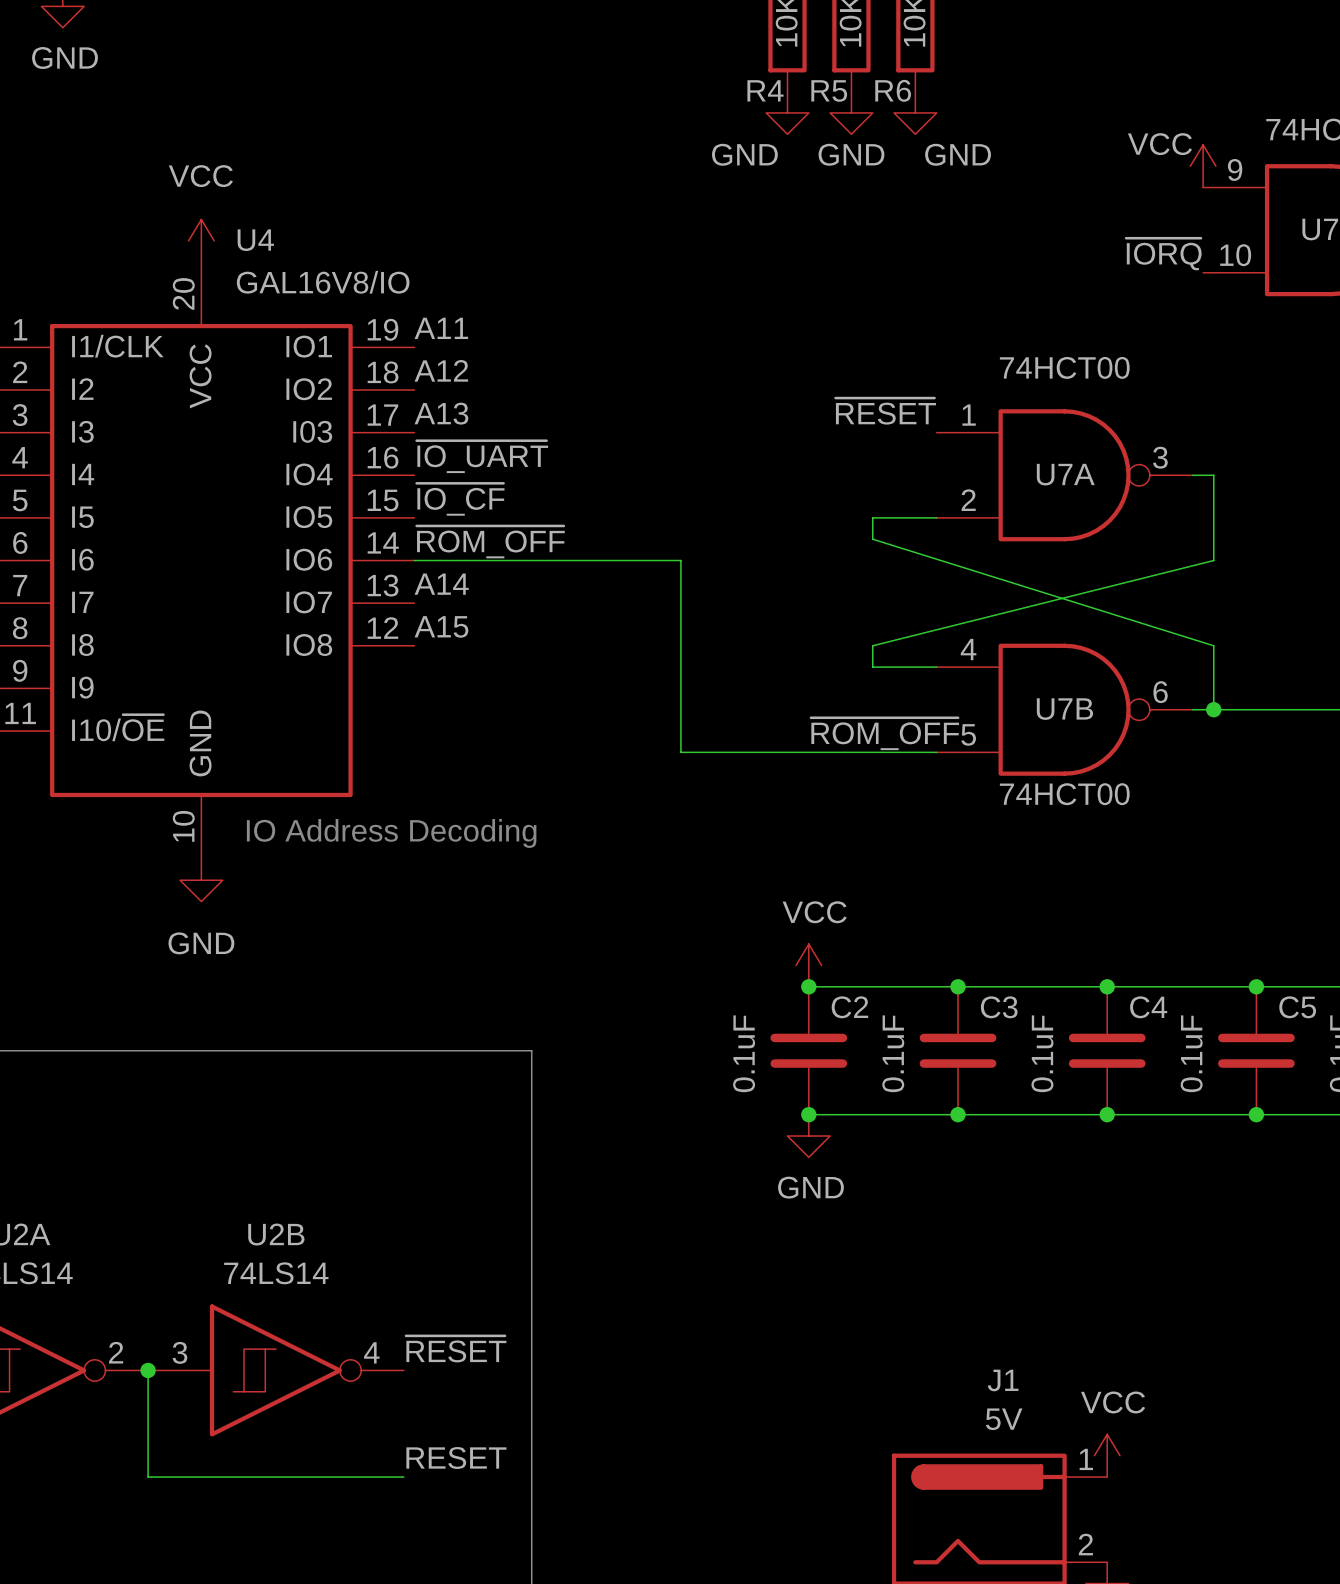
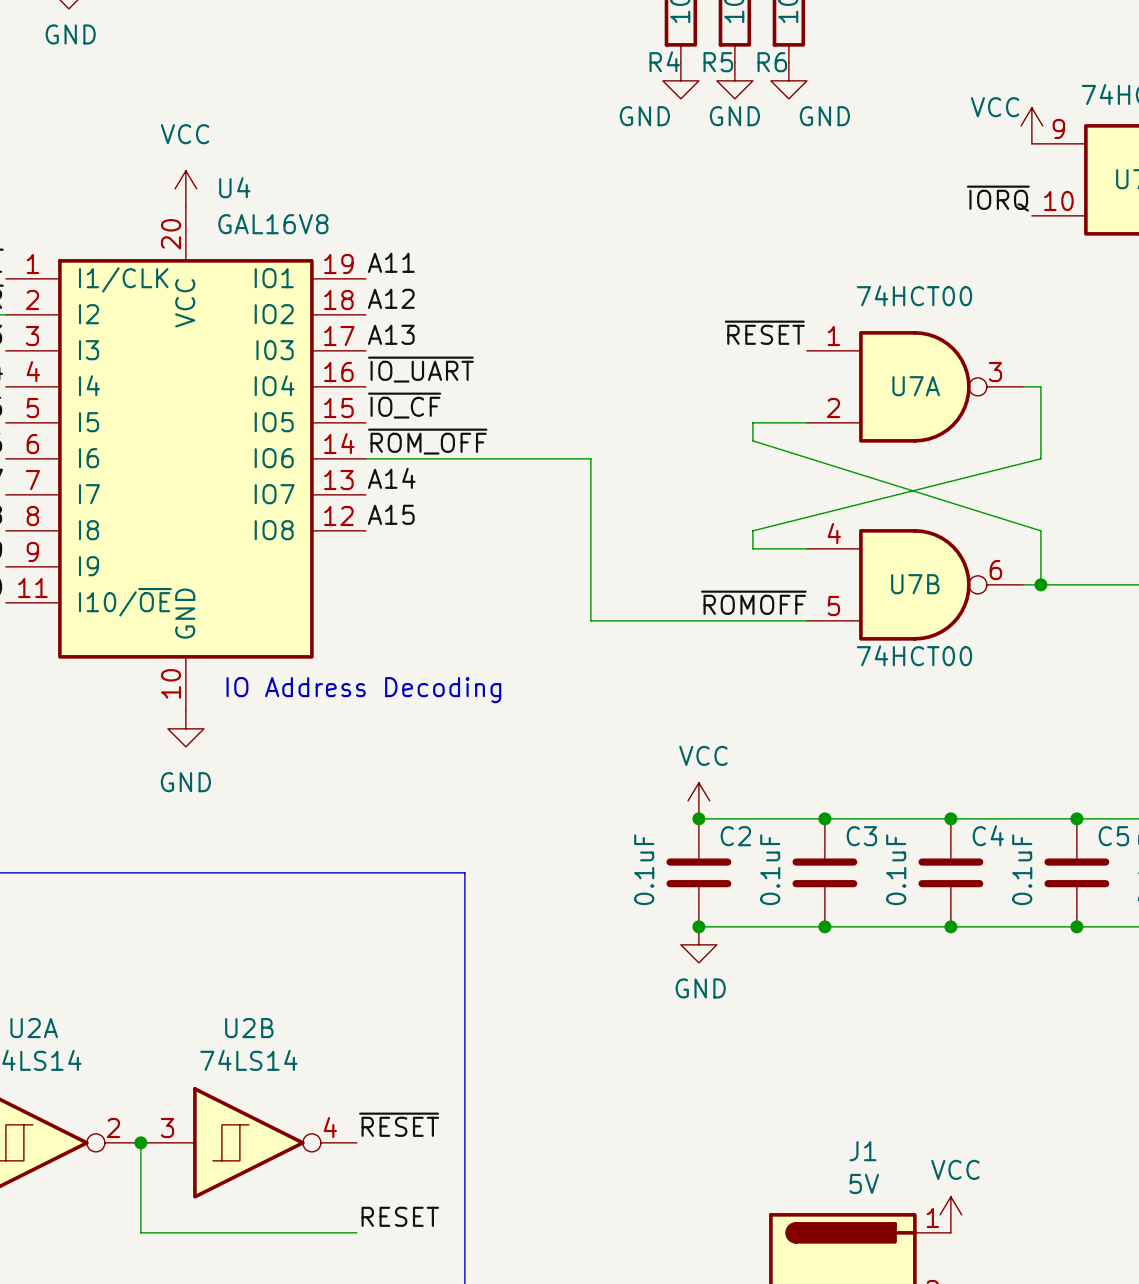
U4 value: GAL16V8/IO (323, 282) -> GAL16V8 (273, 224)
label: ~{ROM_OFF} (884, 733) -> ~{ROMOFF} (753, 602)

